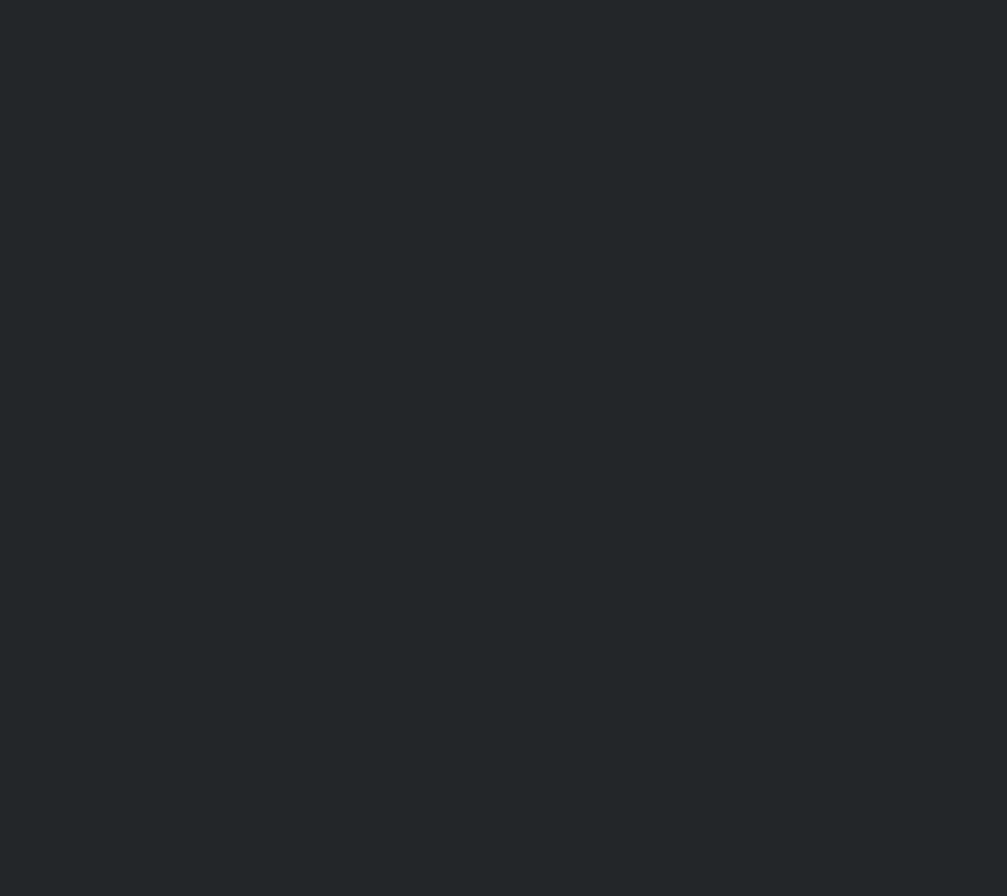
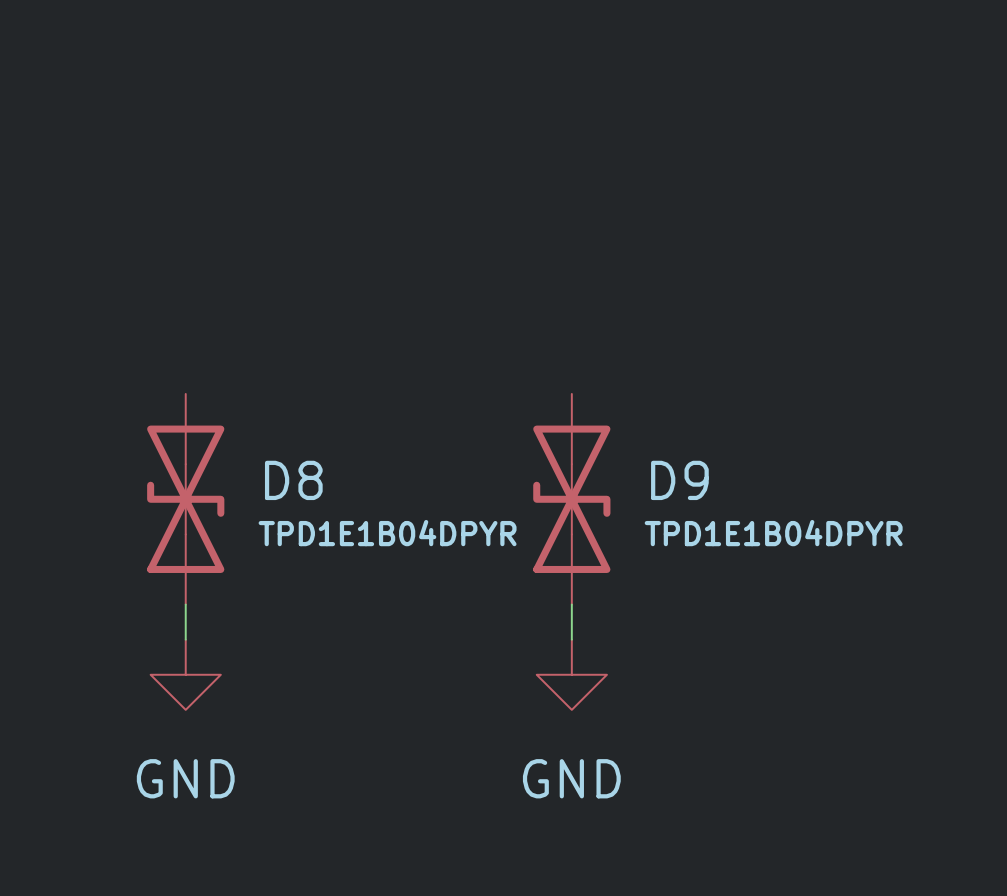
D8: none -> TPD1E1B04DPYR (185, 499)
D9: none -> TPD1E1B04DPYR (571, 499)
wire: none -> (185, 604) (185, 639)
wire: none -> (571, 604) (571, 639)
power symbol: none -> GND (185, 674)
power symbol: none -> GND (571, 674)

